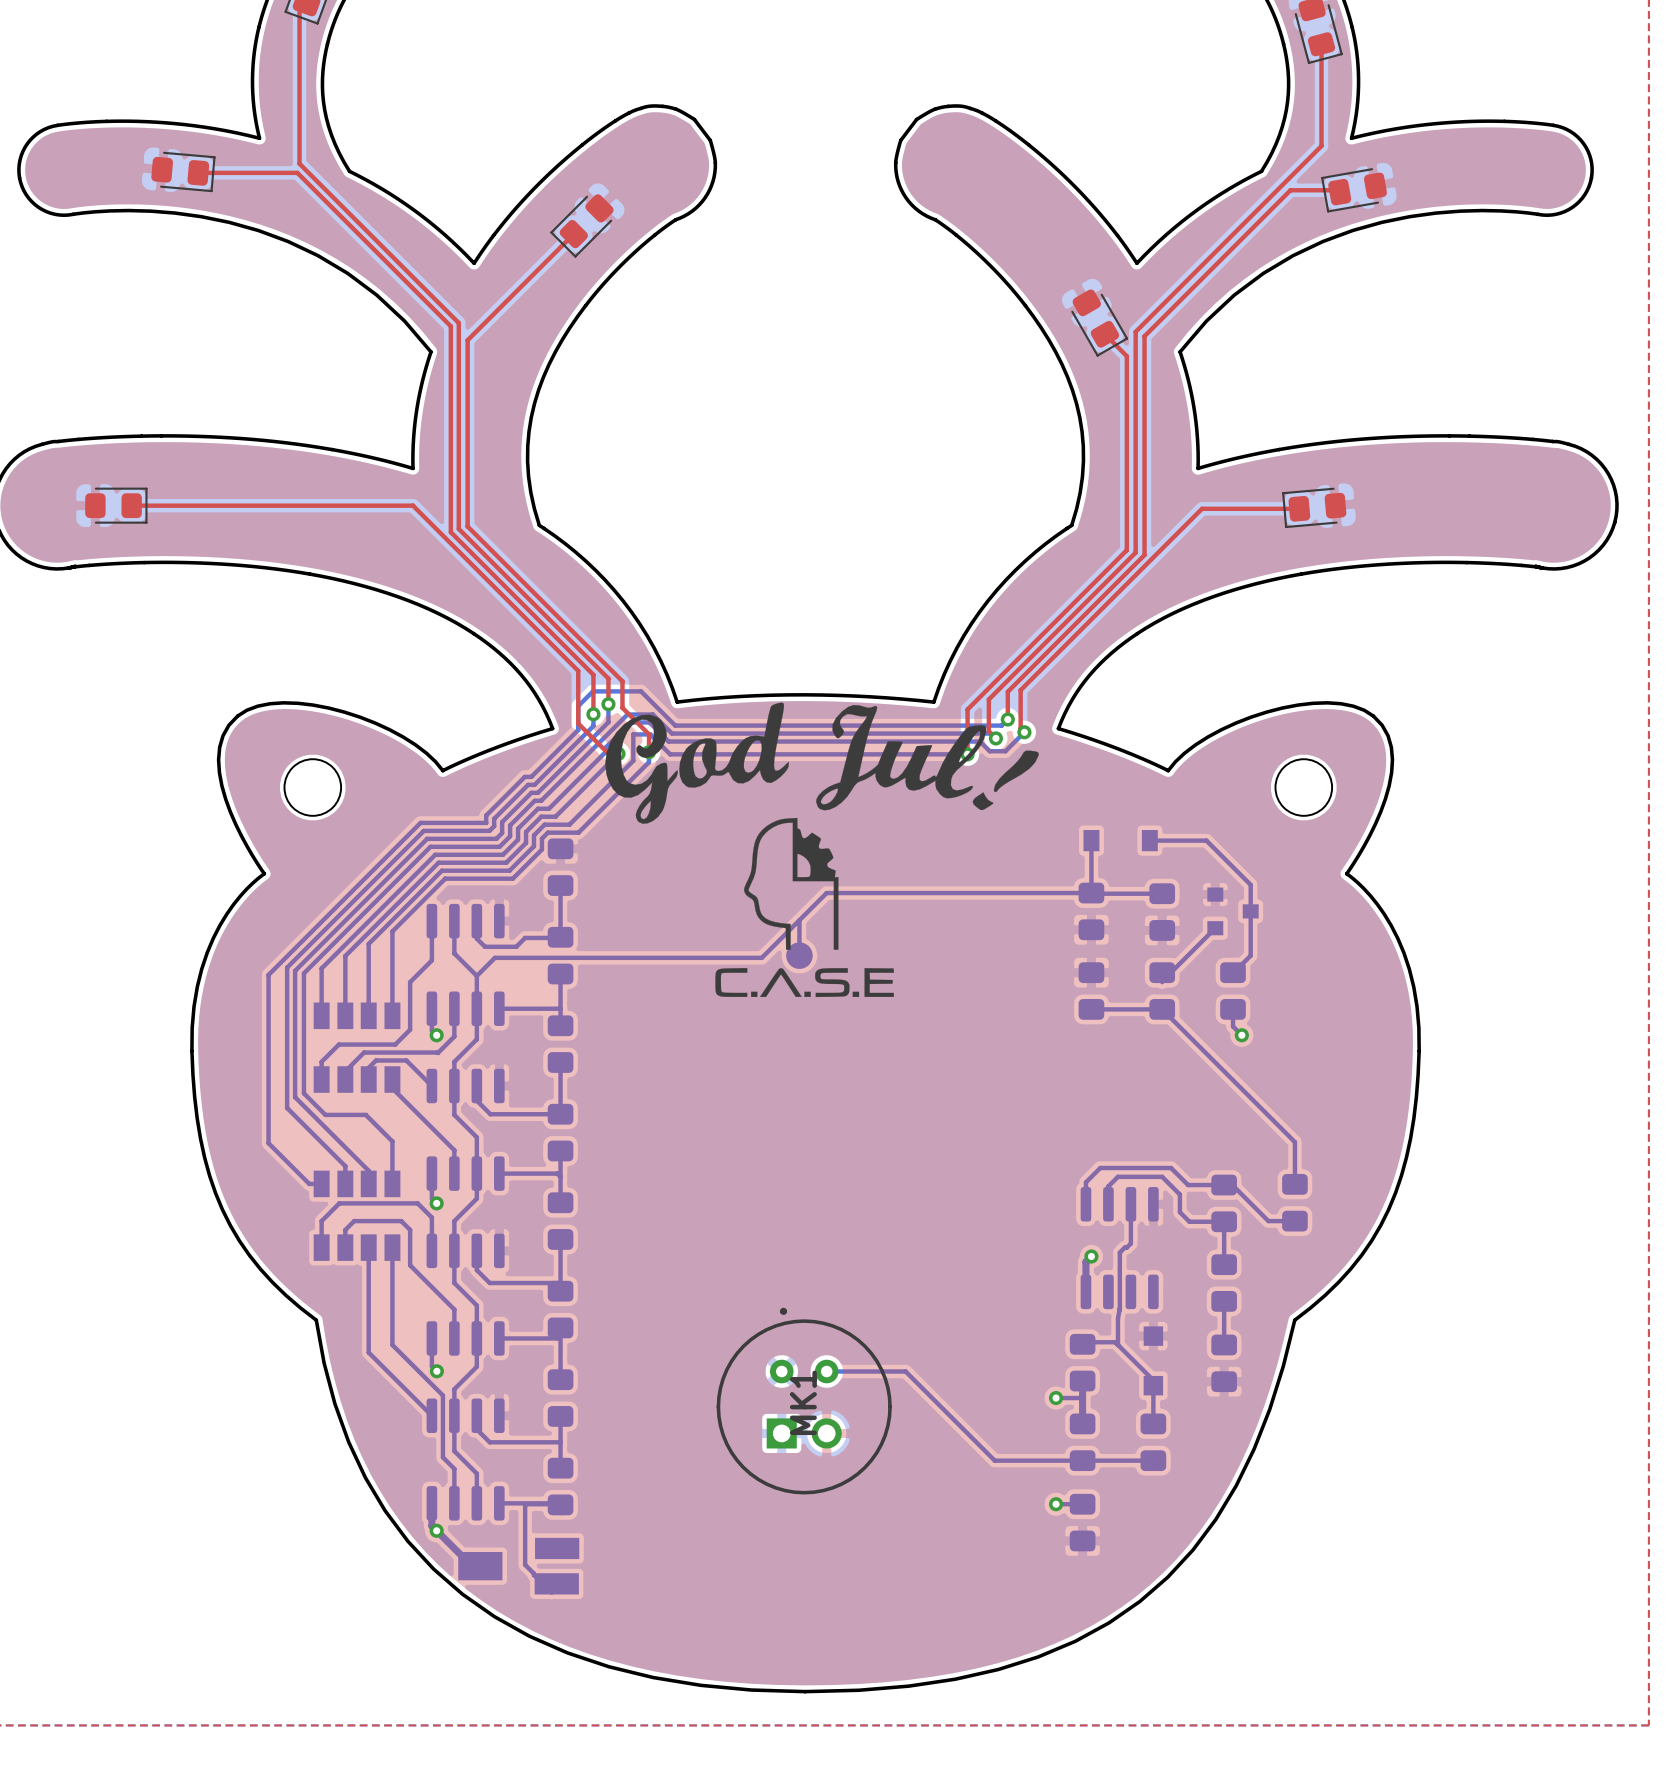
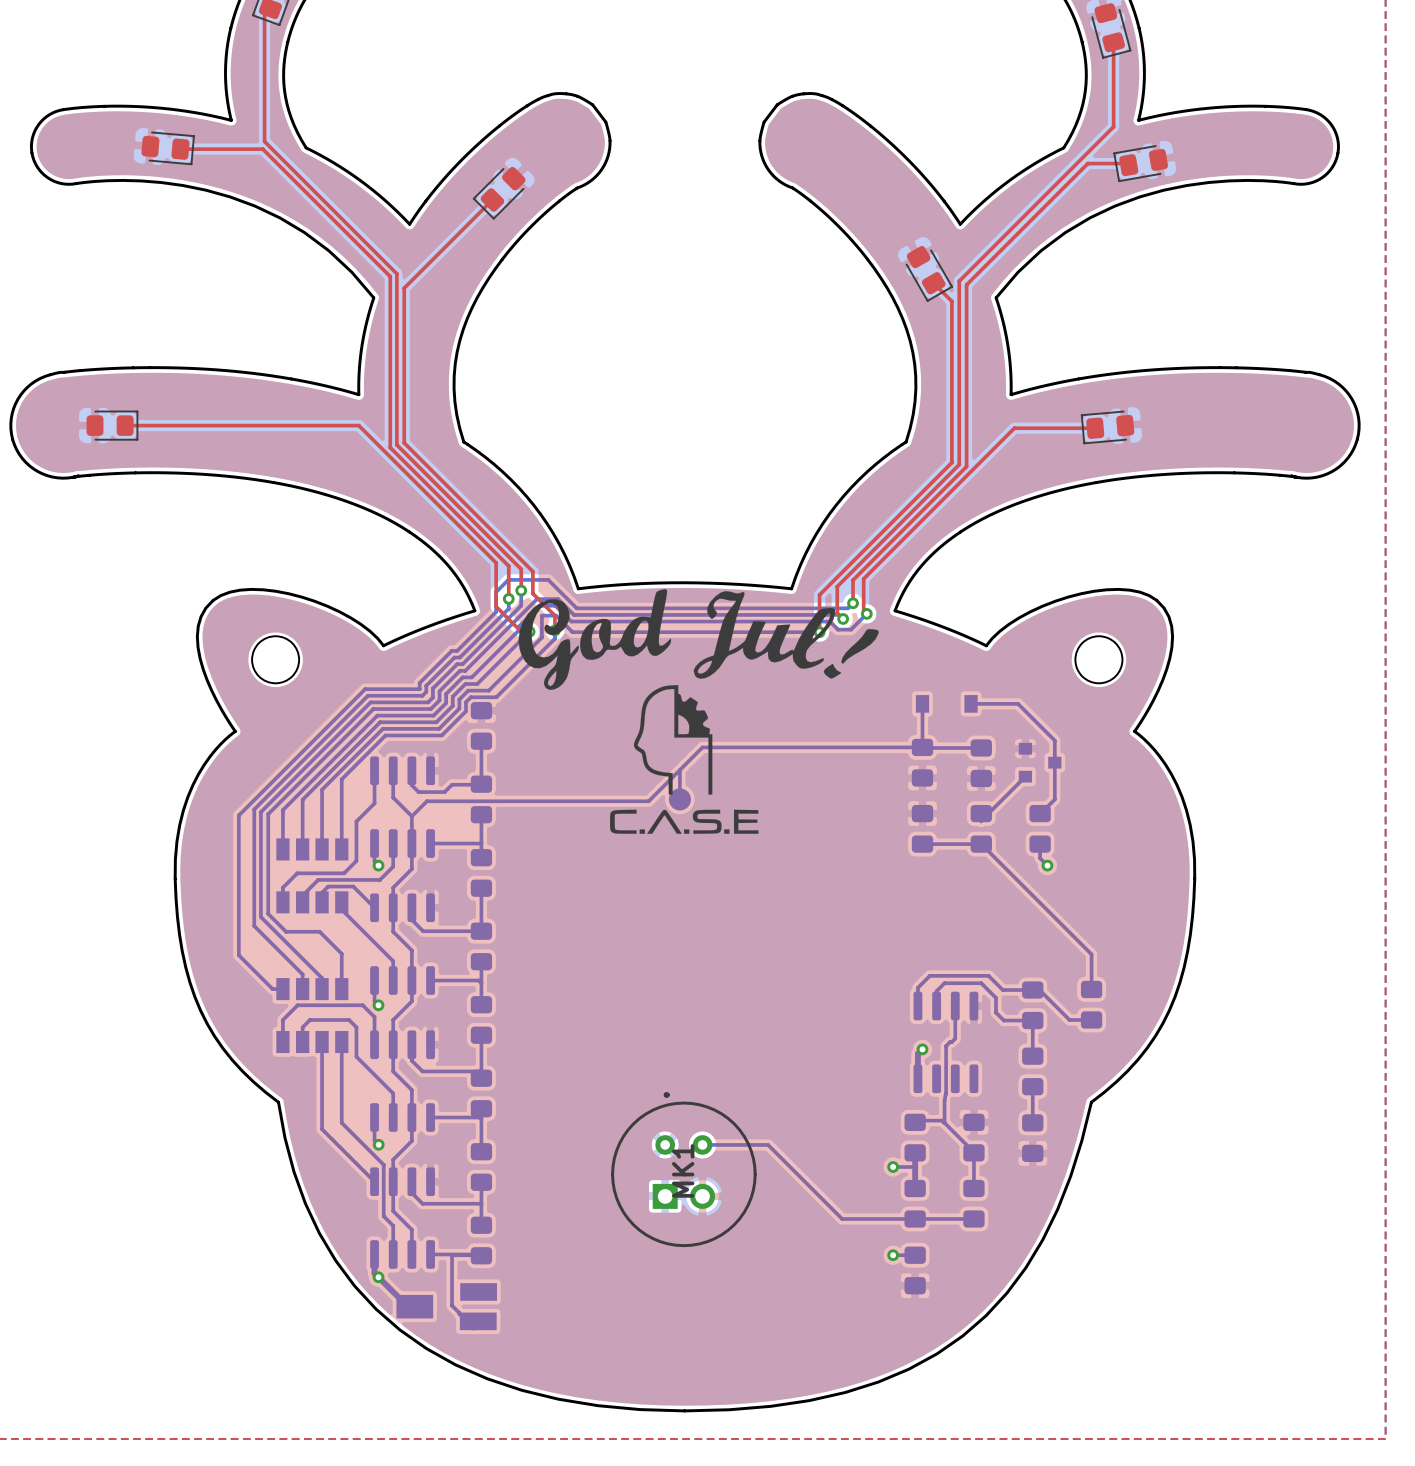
part footprint: [1143, 1326, 1164, 1396] -> [963, 1113, 985, 1162]

